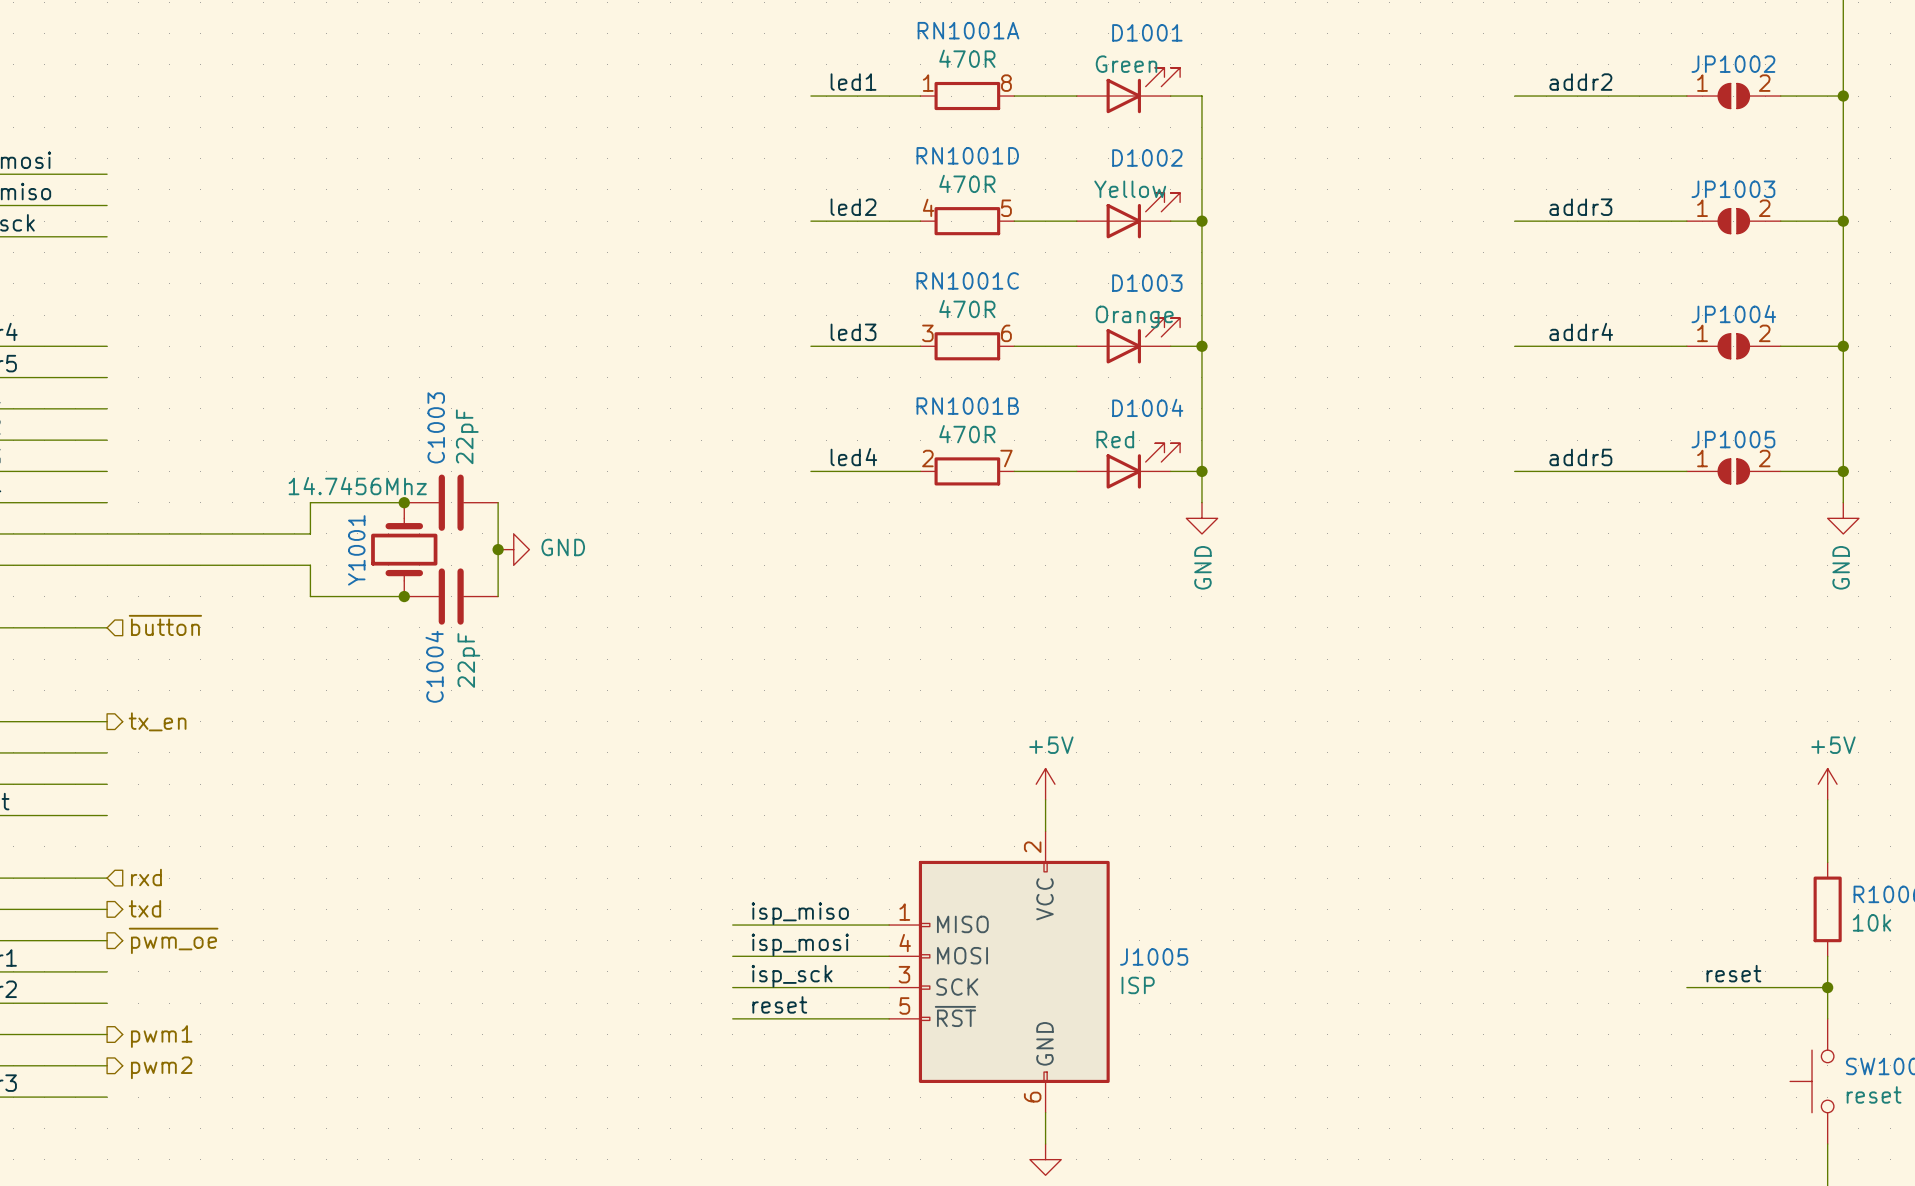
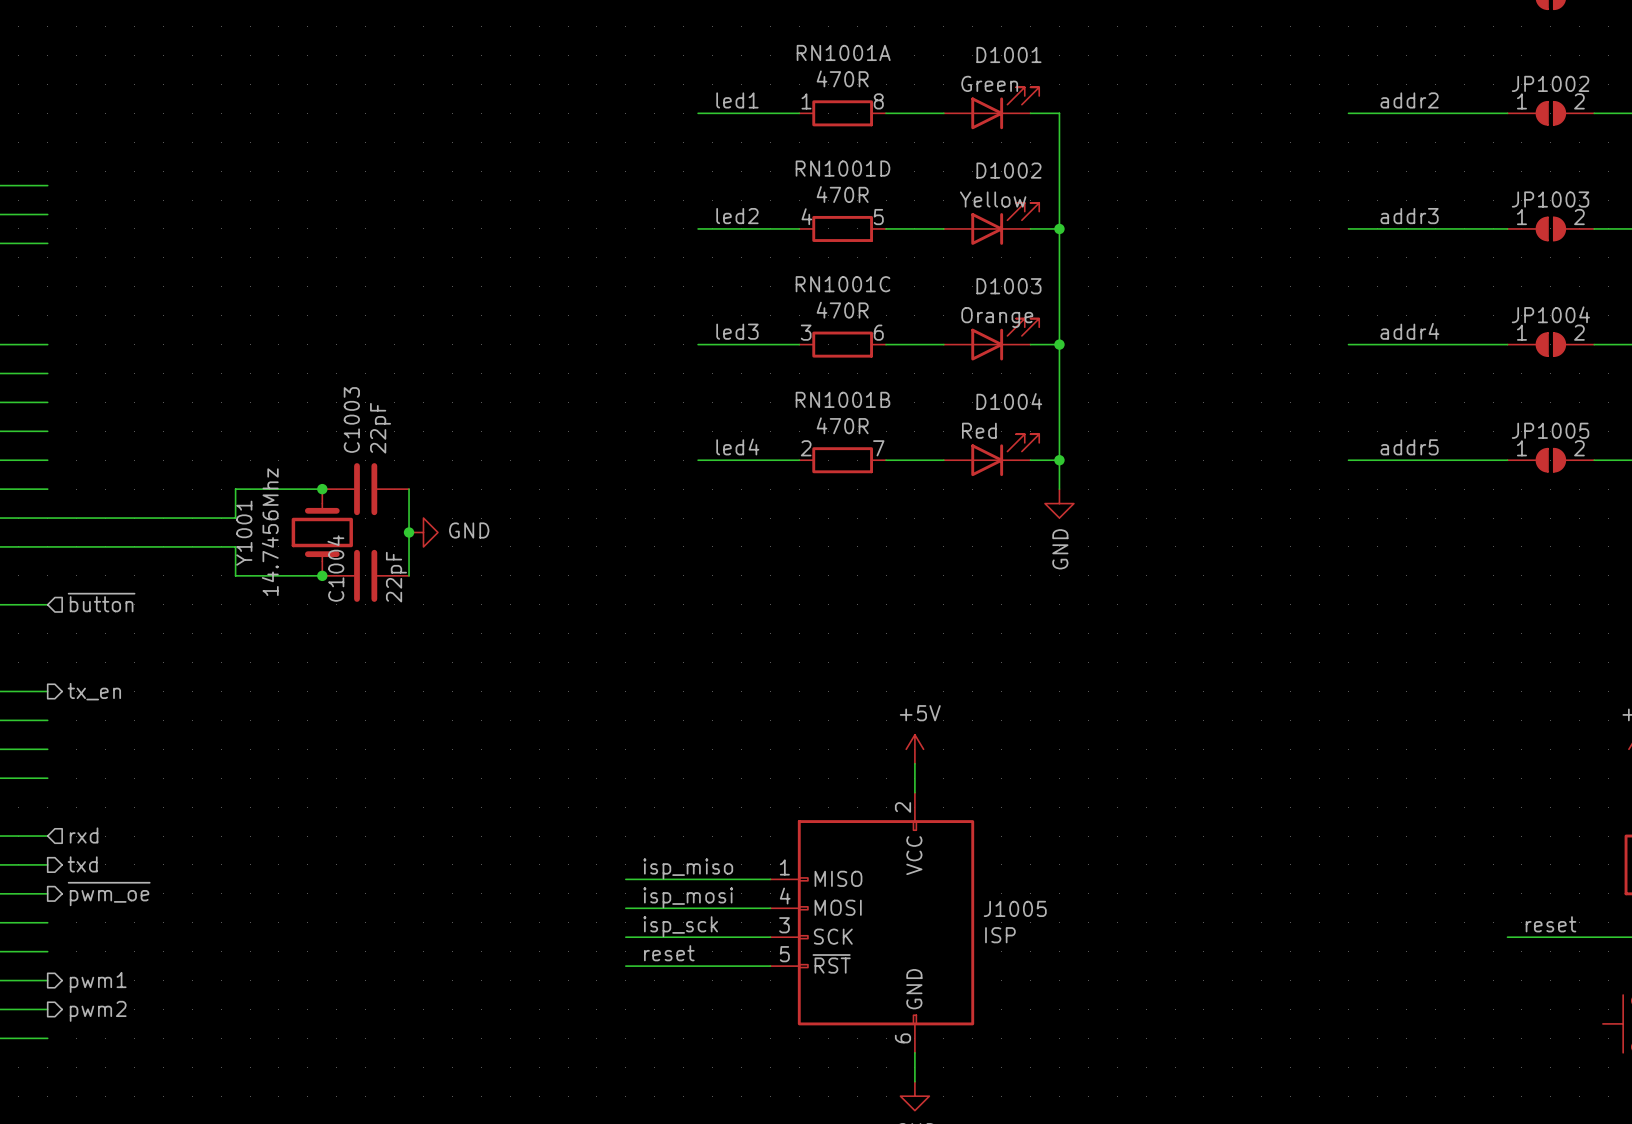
Y1001 value rotation: 0° (357, 486) -> 90° counterclockwise (270, 532)
Y1001 name position: Y1001 (356, 550) -> Y1001 (244, 533)
C1004 value position: 22pF (468, 660) -> 22pF (396, 577)
C1004 name position: C1004 (434, 666) -> C1004 (335, 568)

